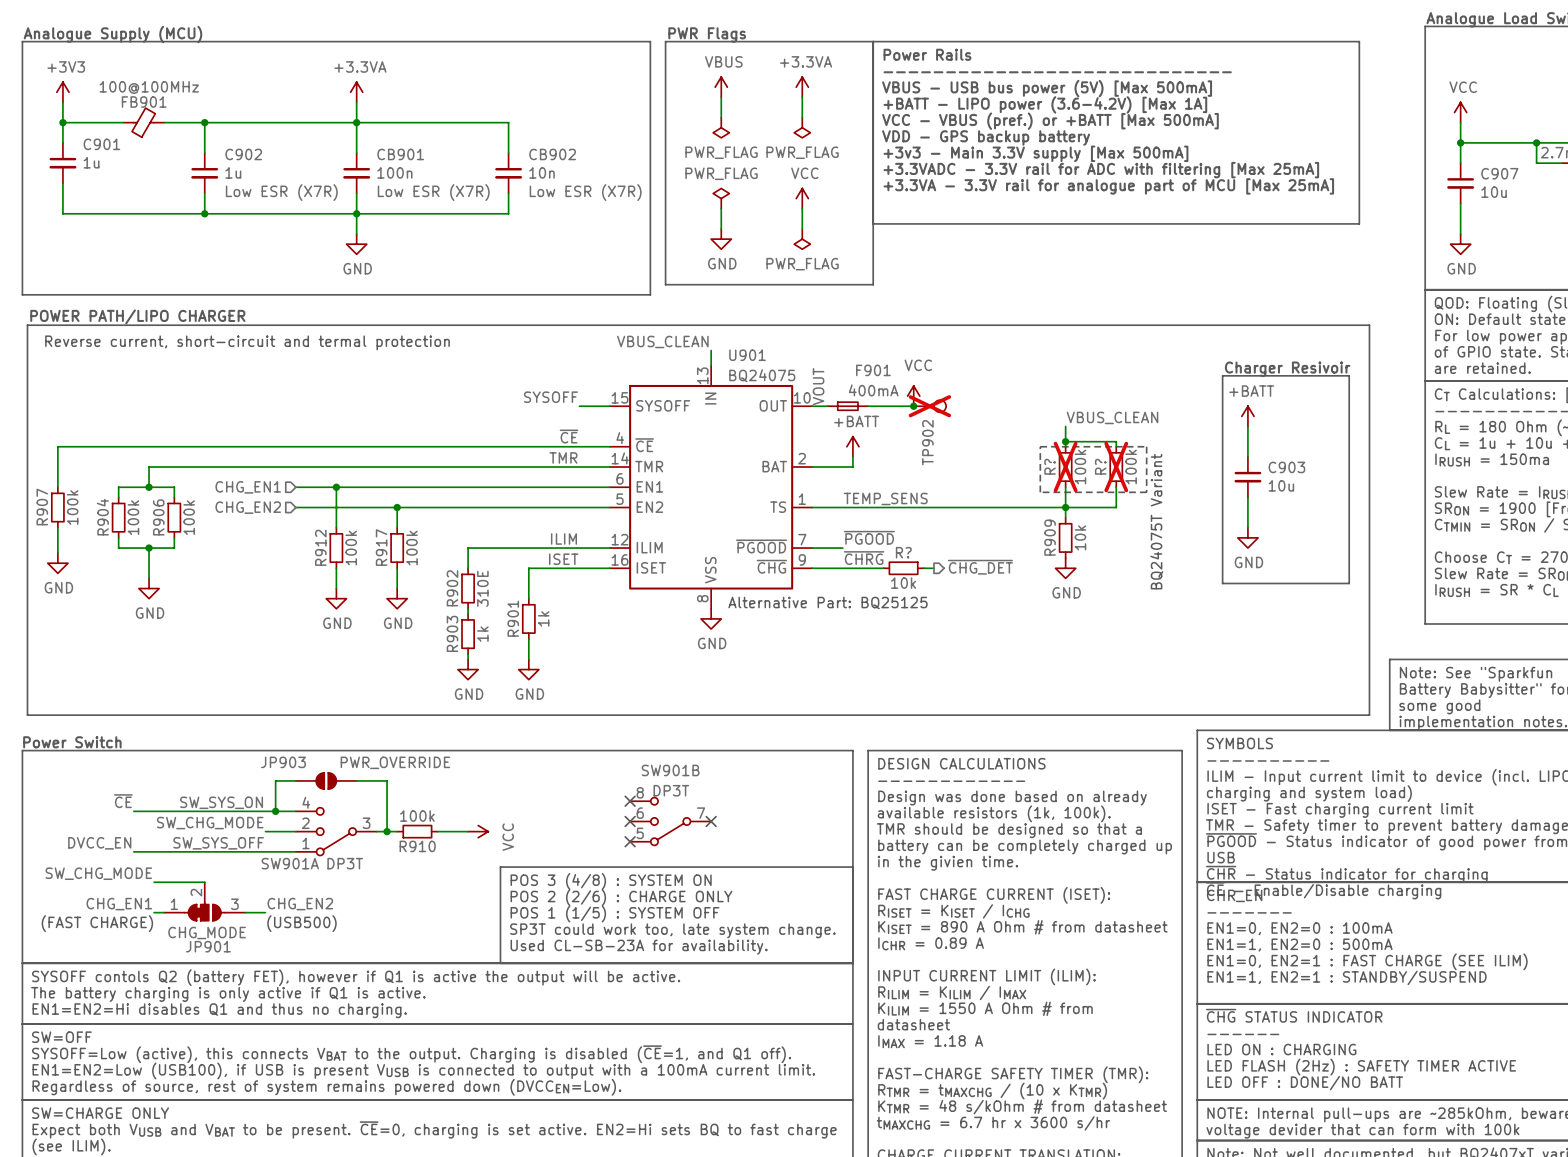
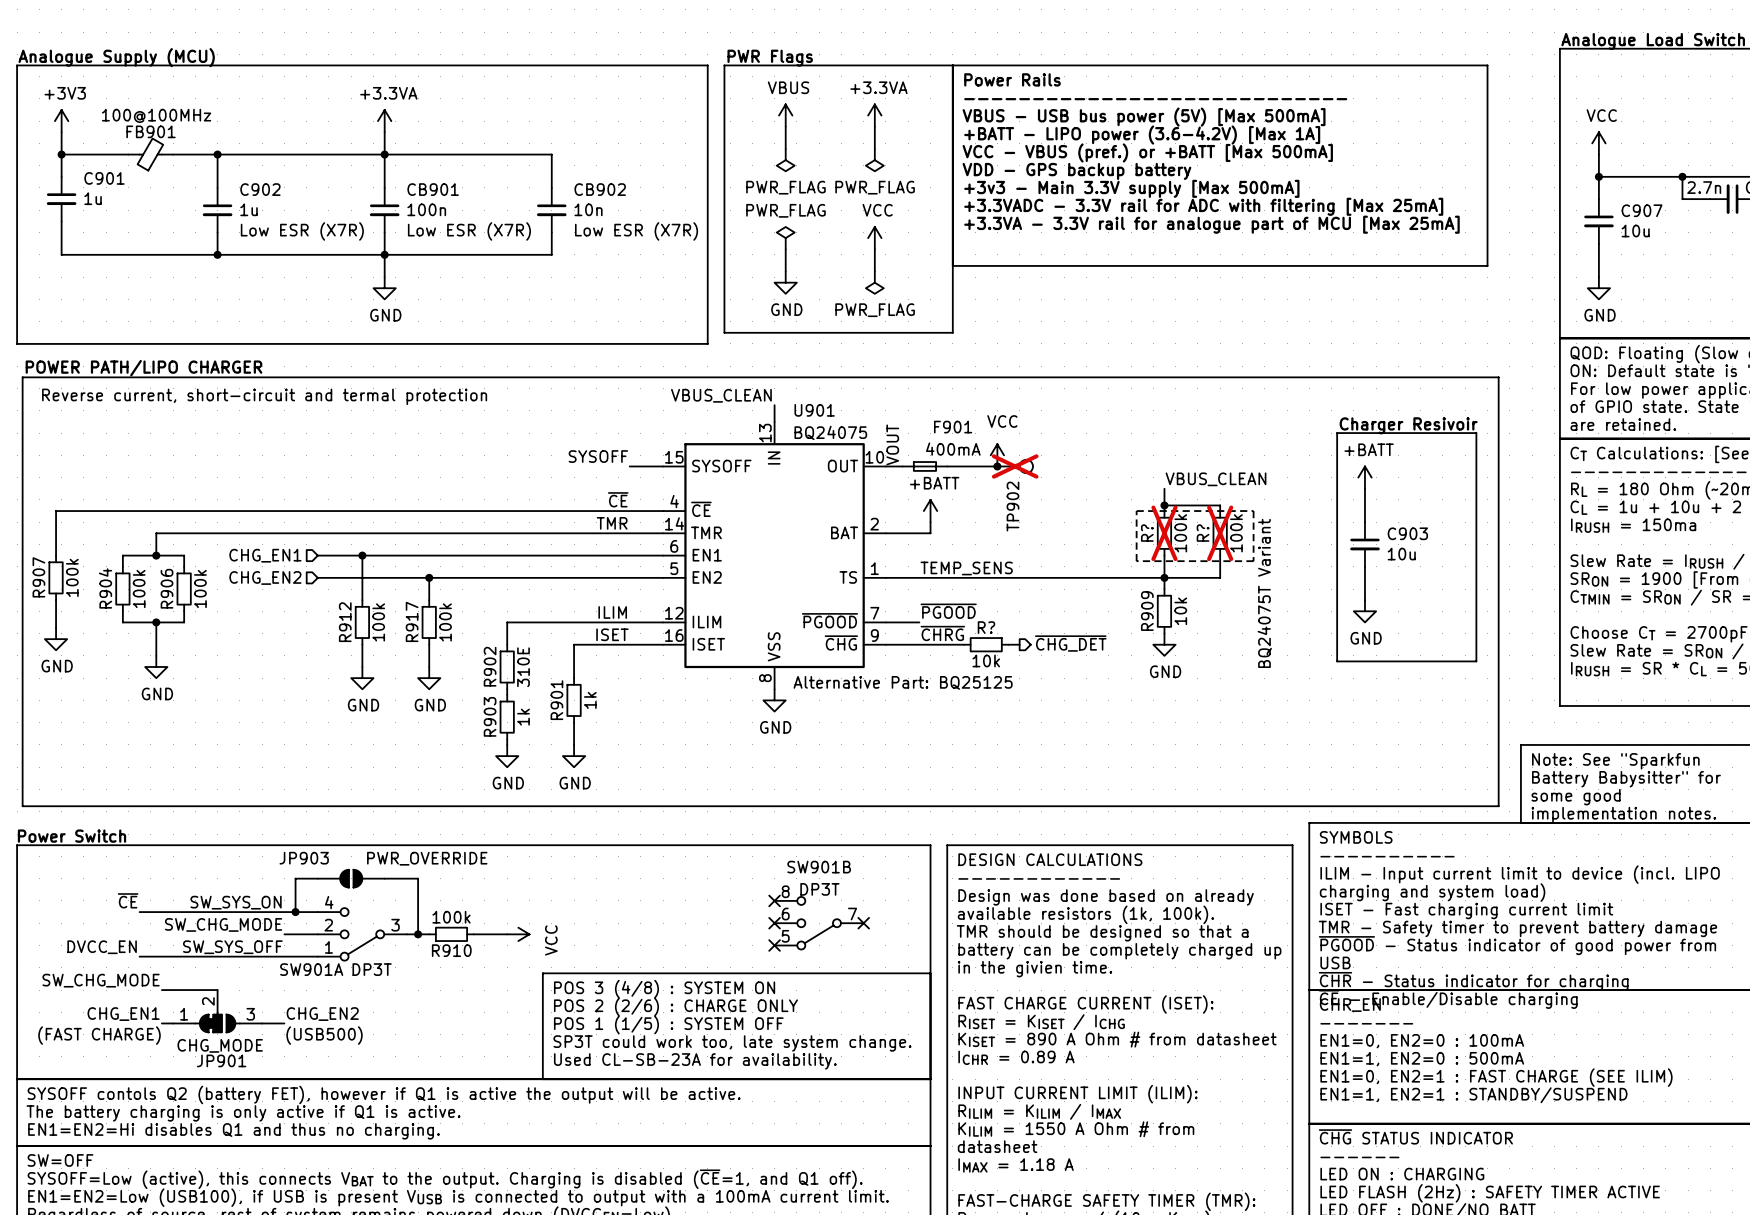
no-connect mark: (630, 801) -> none
no-connect mark: none -> (774, 900)
no-connect mark: (630, 821) -> none
SW901B position: (670, 821) -> (819, 923)
no-connect mark: none -> (863, 923)
no-connect mark: (630, 841) -> none
no-connect mark: none -> (774, 945)

